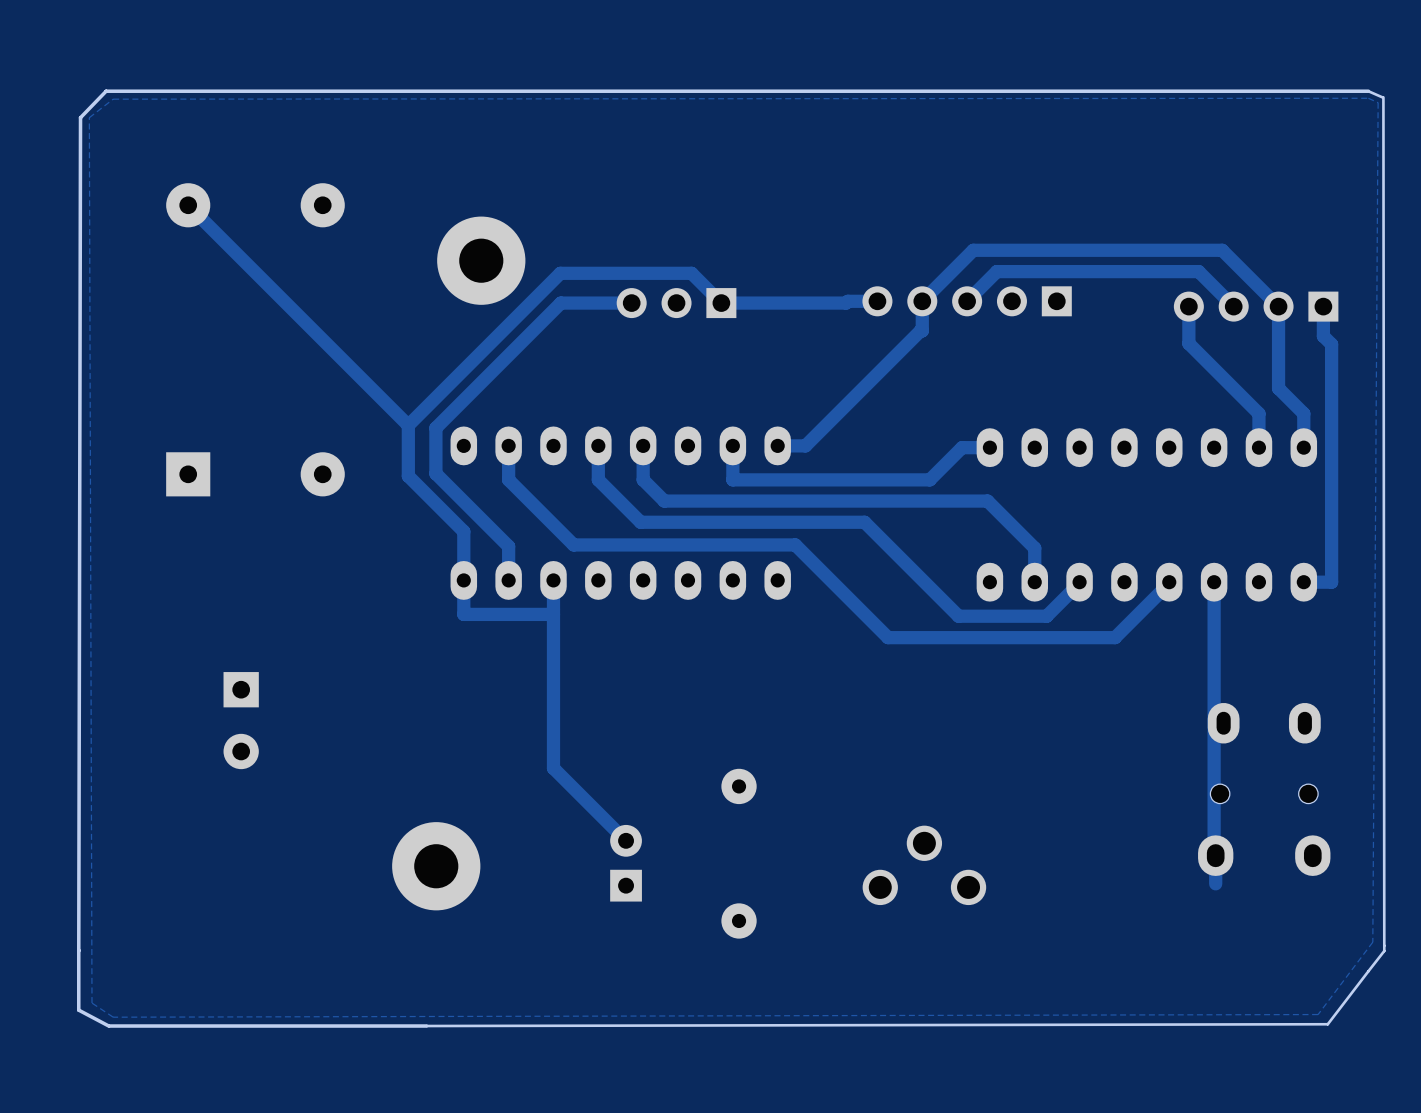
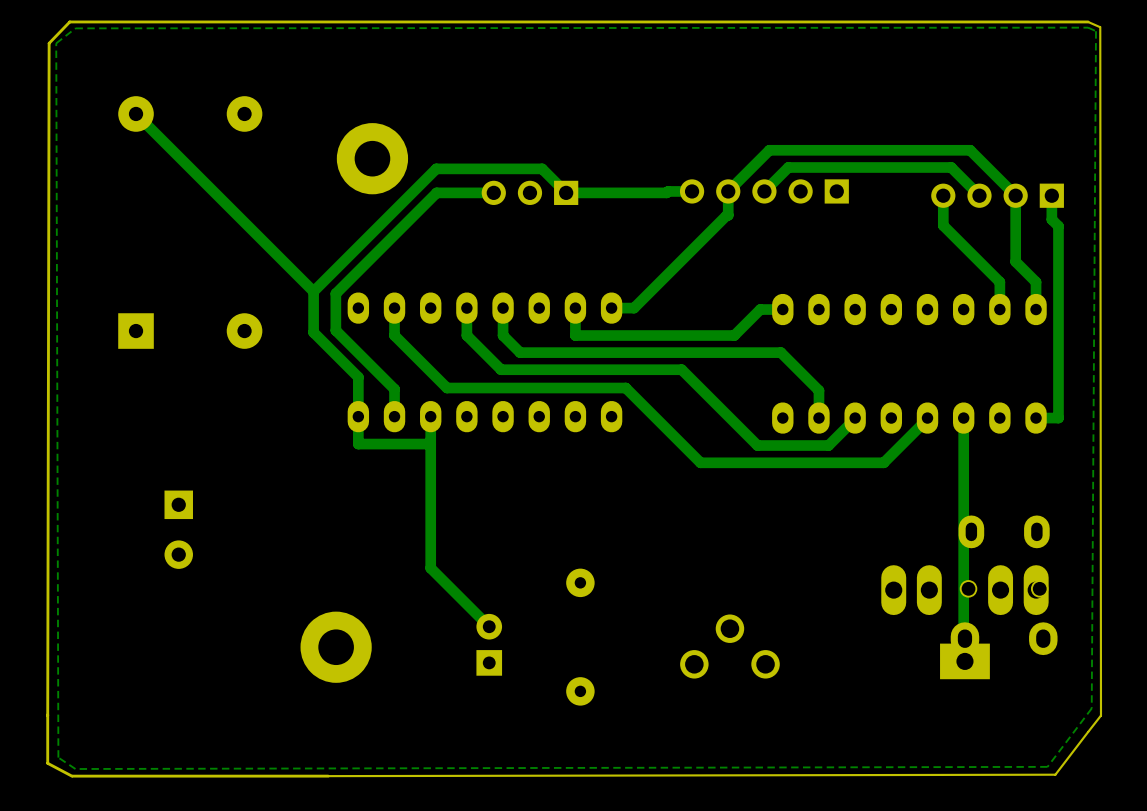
part: none -> (964, 622)

